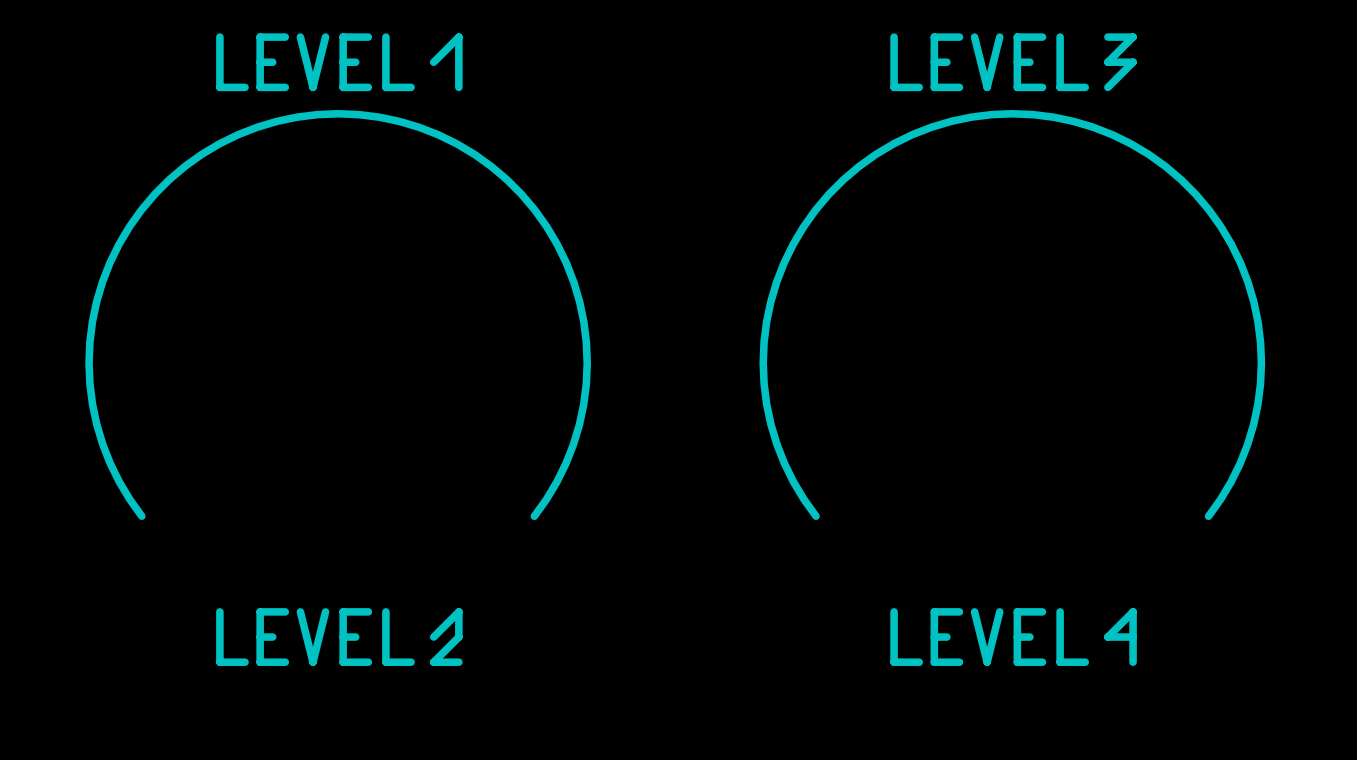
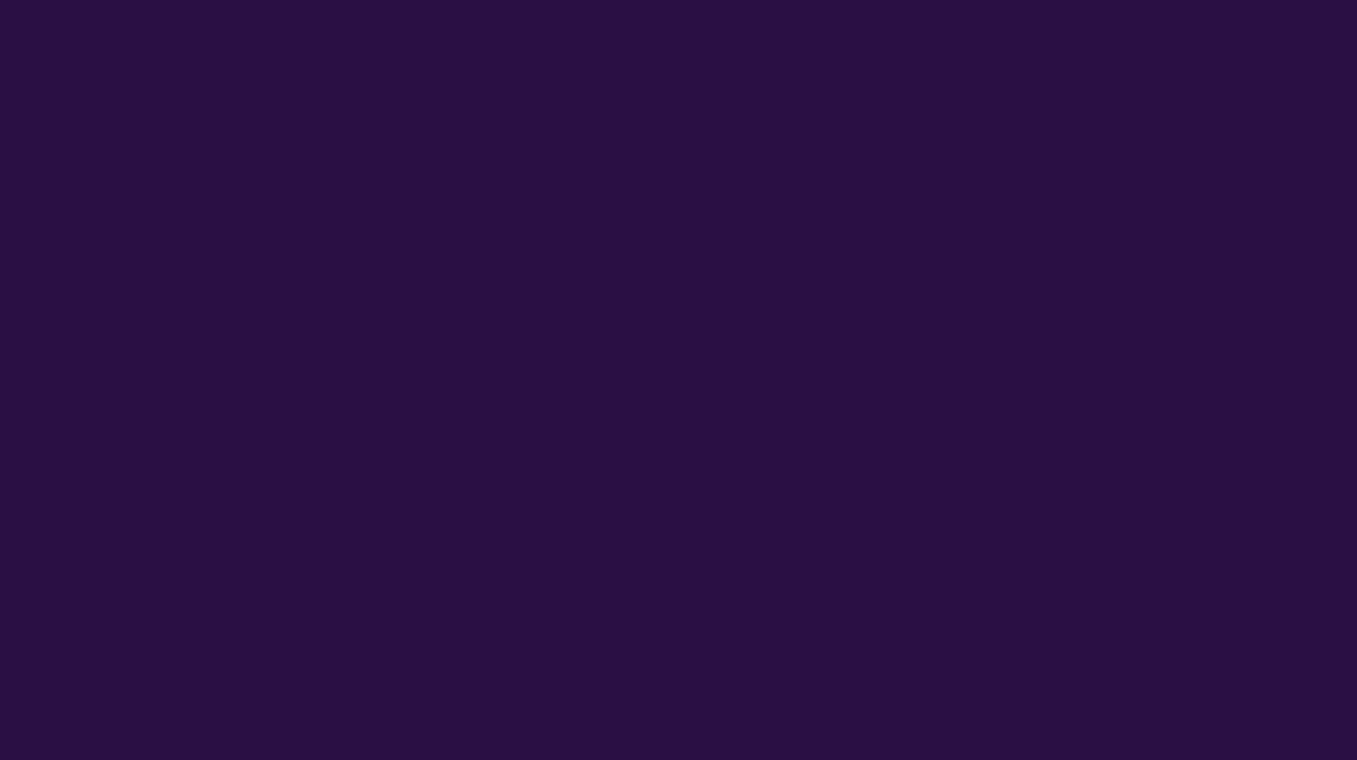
line: (219, 37) (219, 87) (245, 87) -> none
line: (285, 37) (260, 37) (260, 87) (285, 87) -> none
line: (300, 37) (312, 87) (325, 37) -> none
line: (368, 37) (343, 37) (343, 87) (368, 87) -> none
line: (385, 37) (385, 87) (411, 87) -> none
line: (894, 37) (894, 87) (919, 87) -> none
line: (959, 37) (934, 37) (934, 87) (959, 87) -> none
line: (974, 37) (987, 87) (999, 37) -> none
line: (1042, 37) (1017, 37) (1017, 87) (1042, 87) -> none
line: (1060, 37) (1060, 87) (1085, 87) -> none
line: (1107, 37) (1133, 37) (1107, 62) (1133, 62) (1107, 87) -> none
line: (260, 62) (272, 62) -> none
line: (343, 62) (355, 62) -> none
line: (433, 62) (458, 37) (458, 87) -> none
line: (934, 62) (946, 62) -> none
line: (1017, 62) (1029, 62) -> none
line: (141, 516) (119, 481) (110, 463) (96, 424) (89, 383) (89, 363) (92, 322) (102, 282) (118, 244) (129, 226) (154, 194) (185, 166) (219, 143) (238, 134) (276, 121) (317, 114) (338, 113) (358, 114) (399, 121) (419, 127) (456, 143) (491, 166) (521, 194) (534, 210) (557, 244) (573, 282) (583, 322) (587, 363) (586, 383) (579, 424) (566, 463) (556, 481) (534, 516) -> none
line: (816, 516) (804, 499) (784, 463) (770, 424) (764, 383) (763, 363) (766, 322) (776, 282) (793, 244) (803, 226) (828, 194) (859, 166) (876, 154) (912, 134) (931, 127) (971, 117) (1012, 113) (1032, 114) (1073, 121) (1093, 127) (1131, 143) (1165, 166) (1195, 194) (1221, 226) (1231, 244) (1248, 282) (1258, 322) (1261, 363) (1260, 383) (1253, 424) (1247, 444) (1231, 481) (1208, 516) -> none
line: (219, 611) (219, 662) (245, 662) -> none
line: (285, 611) (260, 611) (260, 662) (285, 662) -> none
line: (300, 611) (312, 662) (325, 611) -> none
line: (368, 611) (343, 611) (343, 662) (368, 662) -> none
line: (385, 611) (385, 662) (411, 662) -> none
line: (894, 611) (894, 662) (919, 662) -> none
line: (959, 611) (934, 611) (934, 662) (959, 662) -> none
line: (974, 611) (987, 662) (999, 611) -> none
line: (1042, 611) (1017, 611) (1017, 662) (1042, 662) -> none
line: (1060, 611) (1060, 662) (1085, 662) -> none
line: (260, 637) (272, 637) -> none
line: (343, 637) (355, 637) -> none
line: (433, 637) (458, 611) (458, 637) (433, 662) (458, 662) -> none
line: (934, 637) (946, 637) -> none
line: (1017, 637) (1029, 637) -> none
line: (1133, 637) (1107, 637) (1133, 611) (1133, 662) -> none

